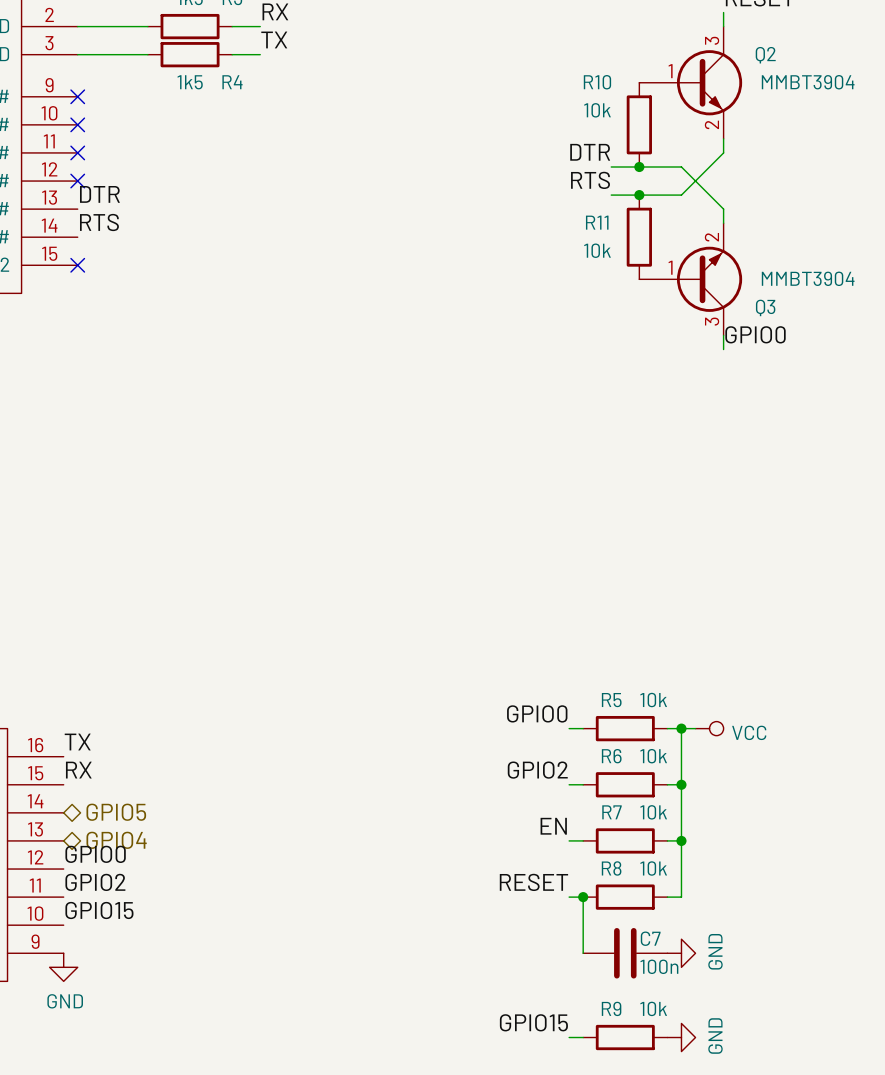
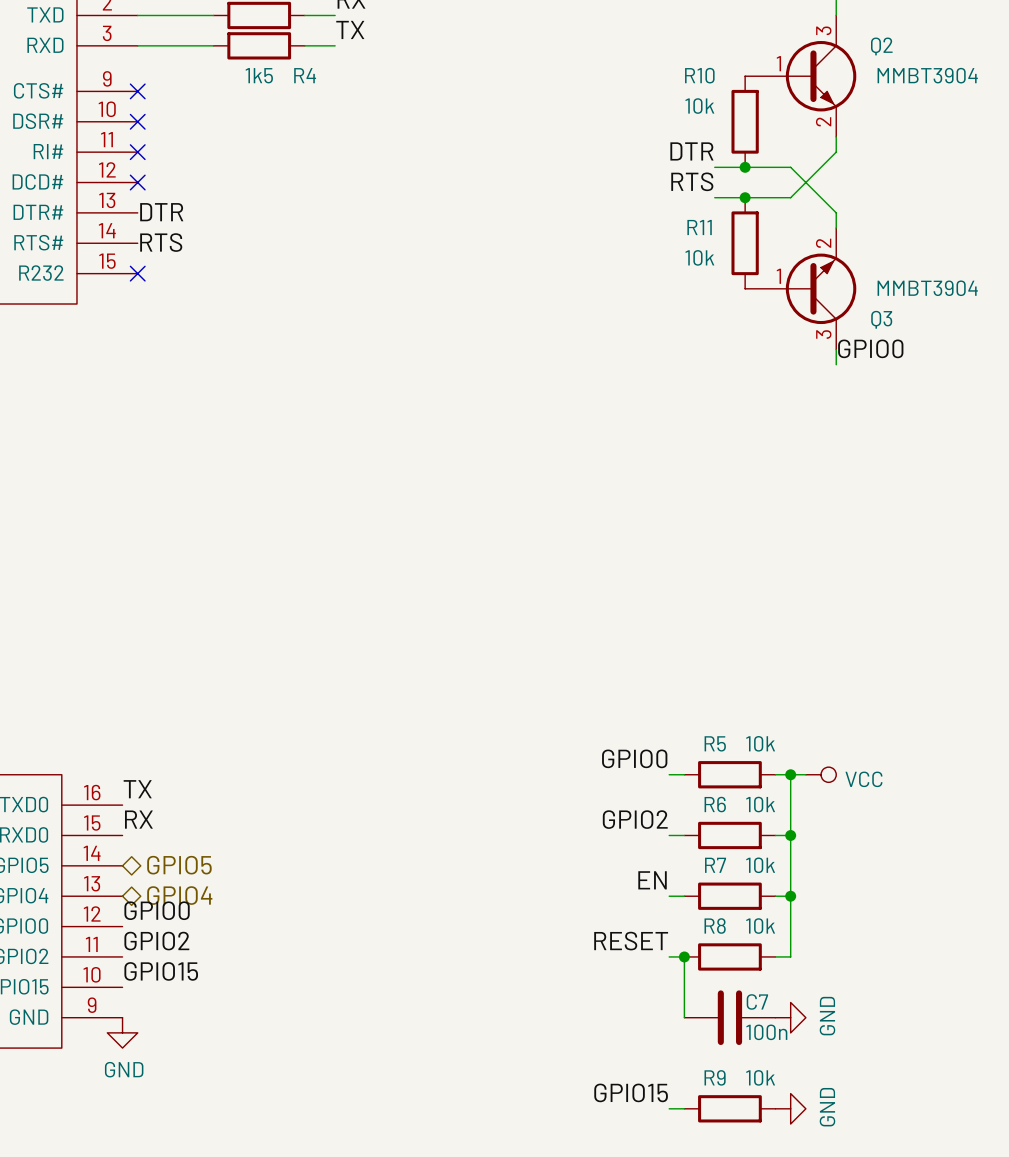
label position: DTR (99, 194) -> DTR (161, 212)
label position: RTS (99, 222) -> RTS (161, 242)

